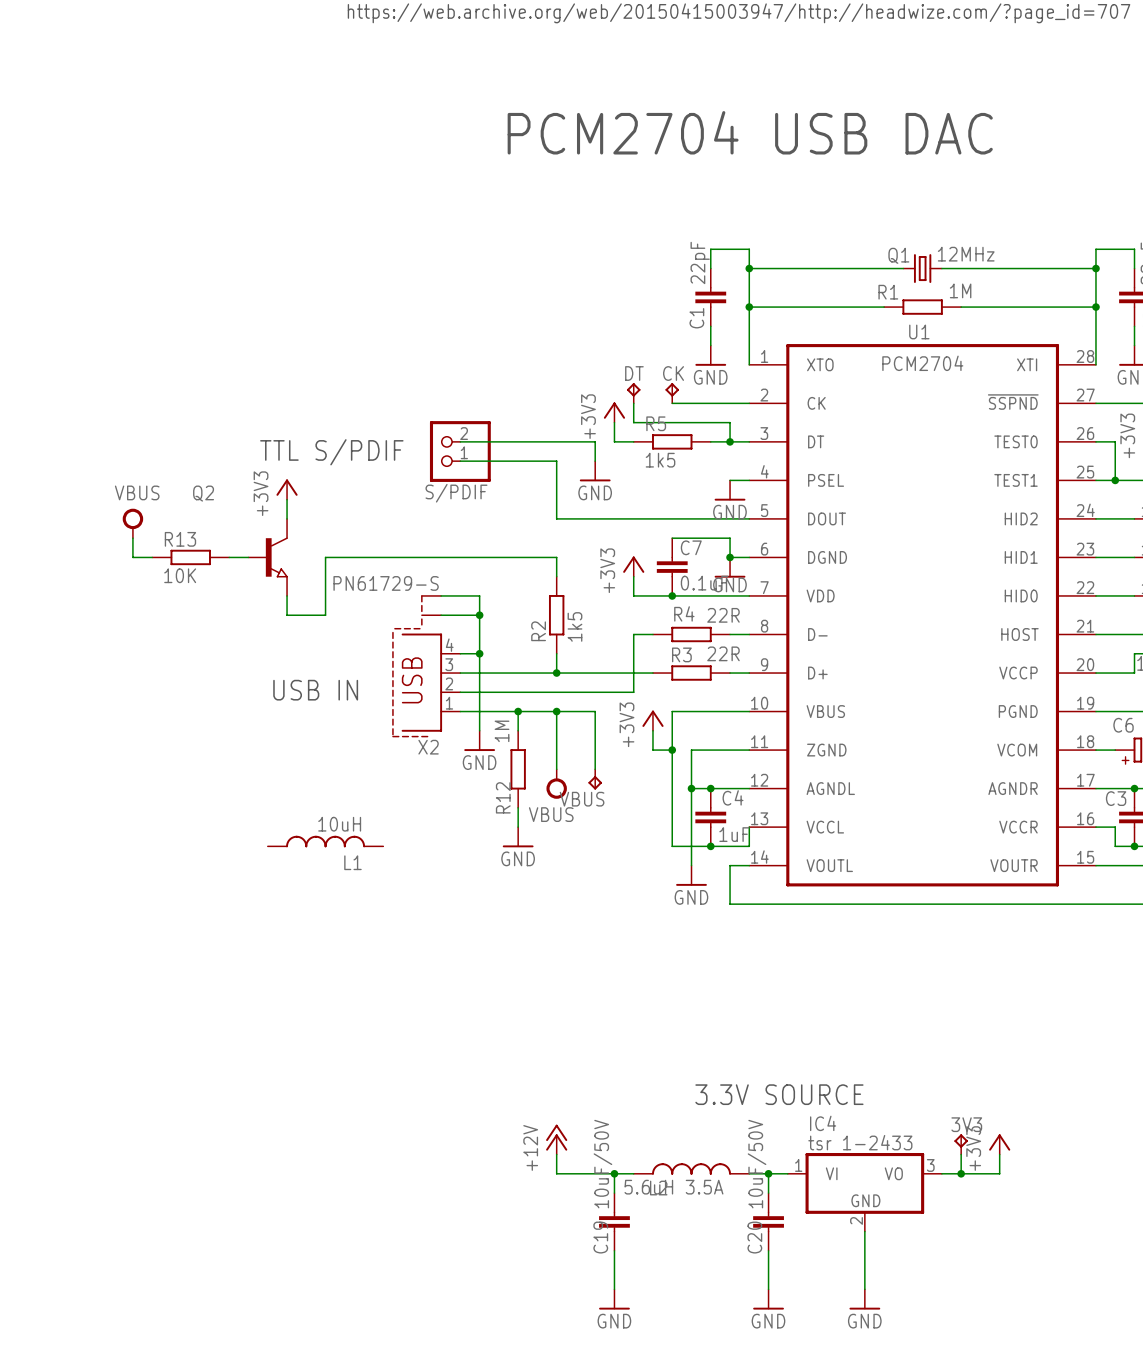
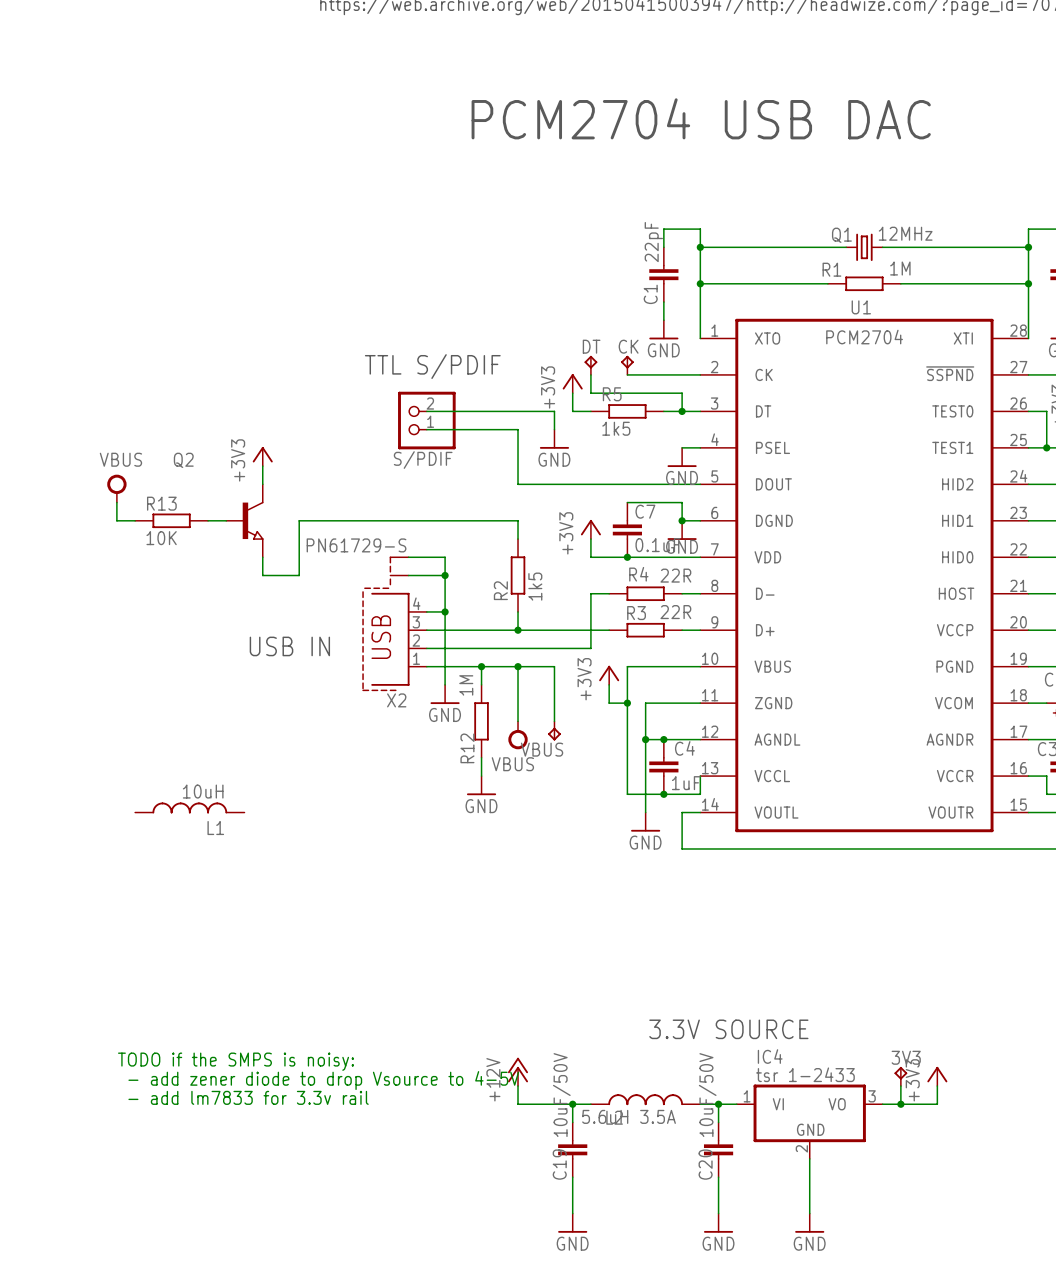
text position: TTL S/PDIF (331, 452) -> TTL S/PDIF (432, 366)
L1 position: (325, 841) -> (189, 807)
text: none -> TODO if the SMPS is noisy: (235, 1061)
text: none -> - add zener diode to drop Vsource to 4-5V (323, 1080)
text: none -> - add lm7833 for 3.3v rail (248, 1097)

